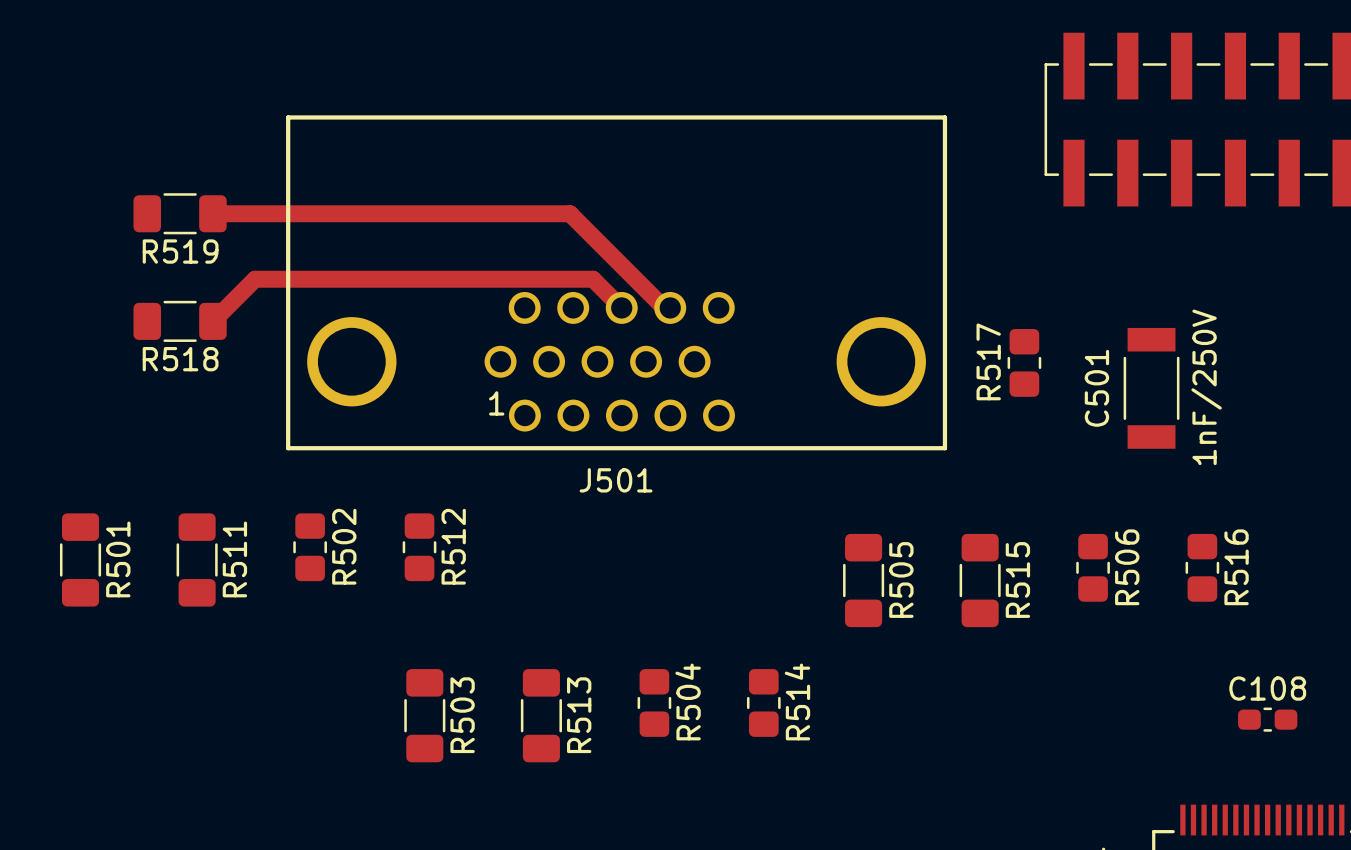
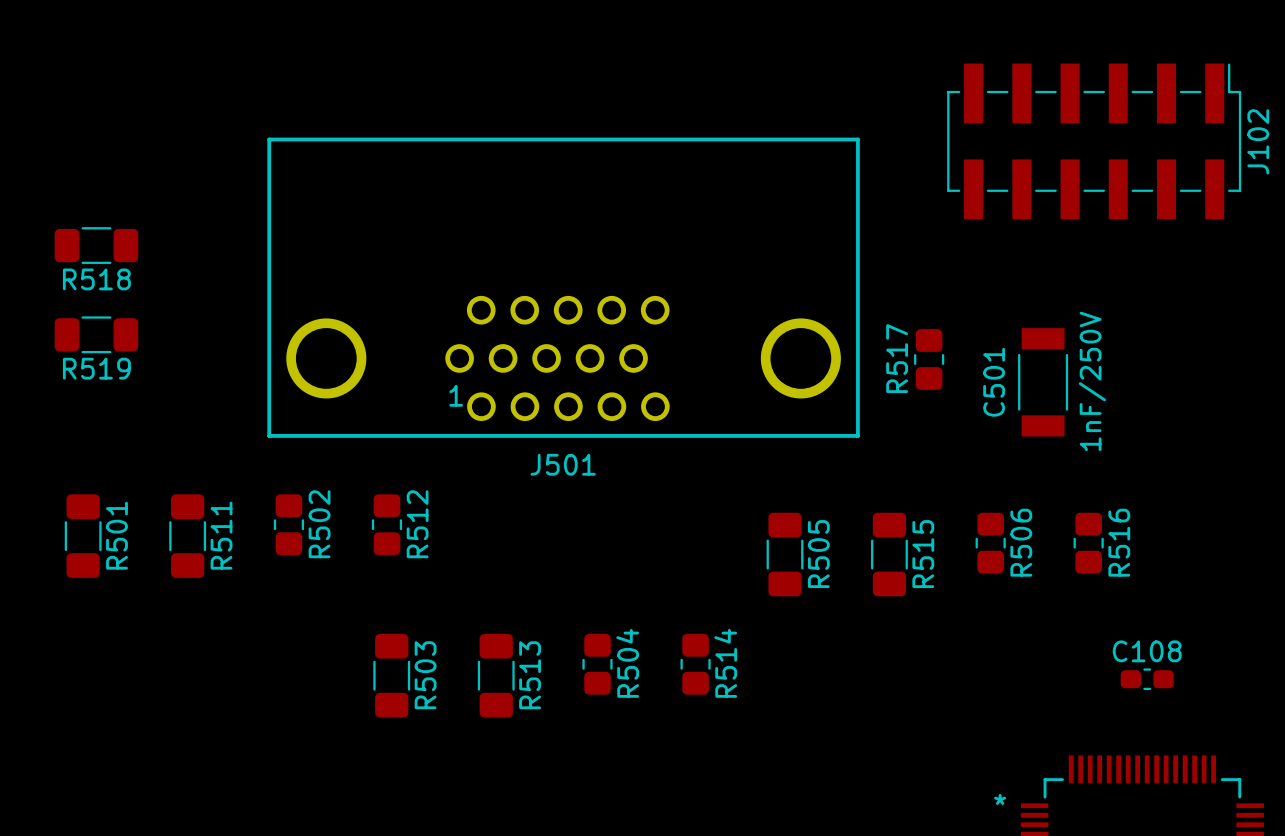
R519 position: (180, 213) -> (96, 334)
track: (212, 213) (570, 213) (664, 307) (670, 307) -> none
track: (621, 307) (593, 279) (255, 279) (212, 321) -> none
R518 position: (180, 321) -> (96, 245)

